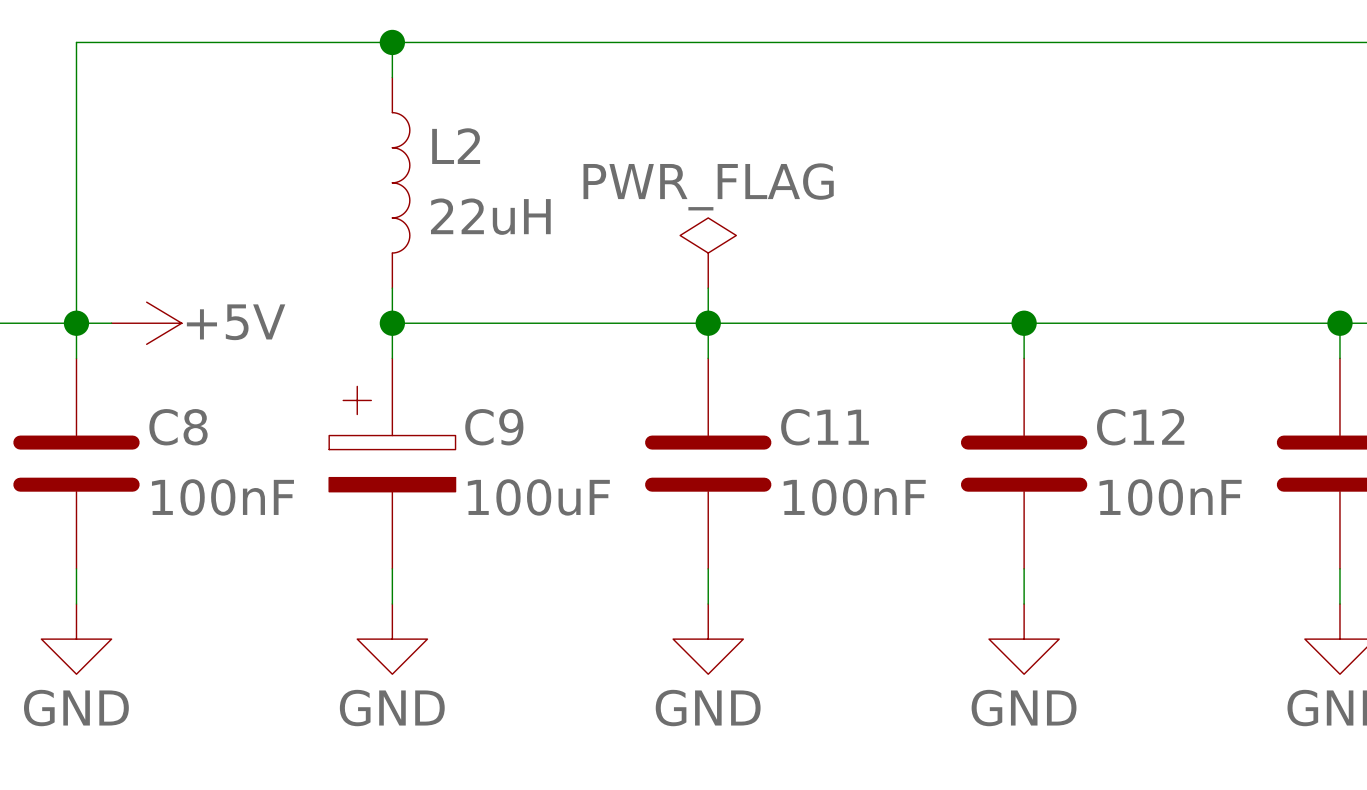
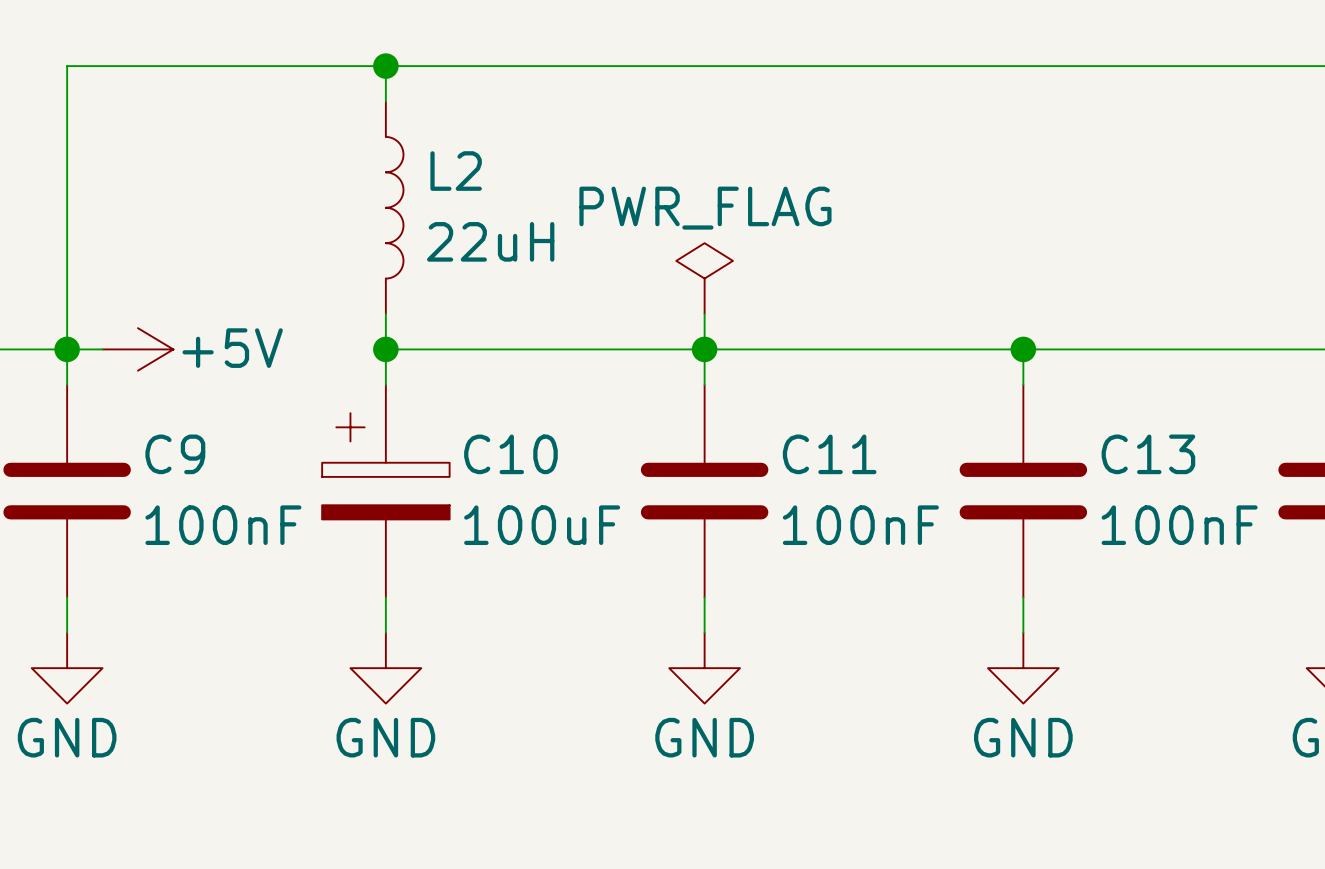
C8 name: C8 (178, 427) -> C9 (175, 454)
C9 name: C9 (494, 427) -> C10 (510, 454)
C12 name: C12 (1140, 427) -> C13 (1148, 454)

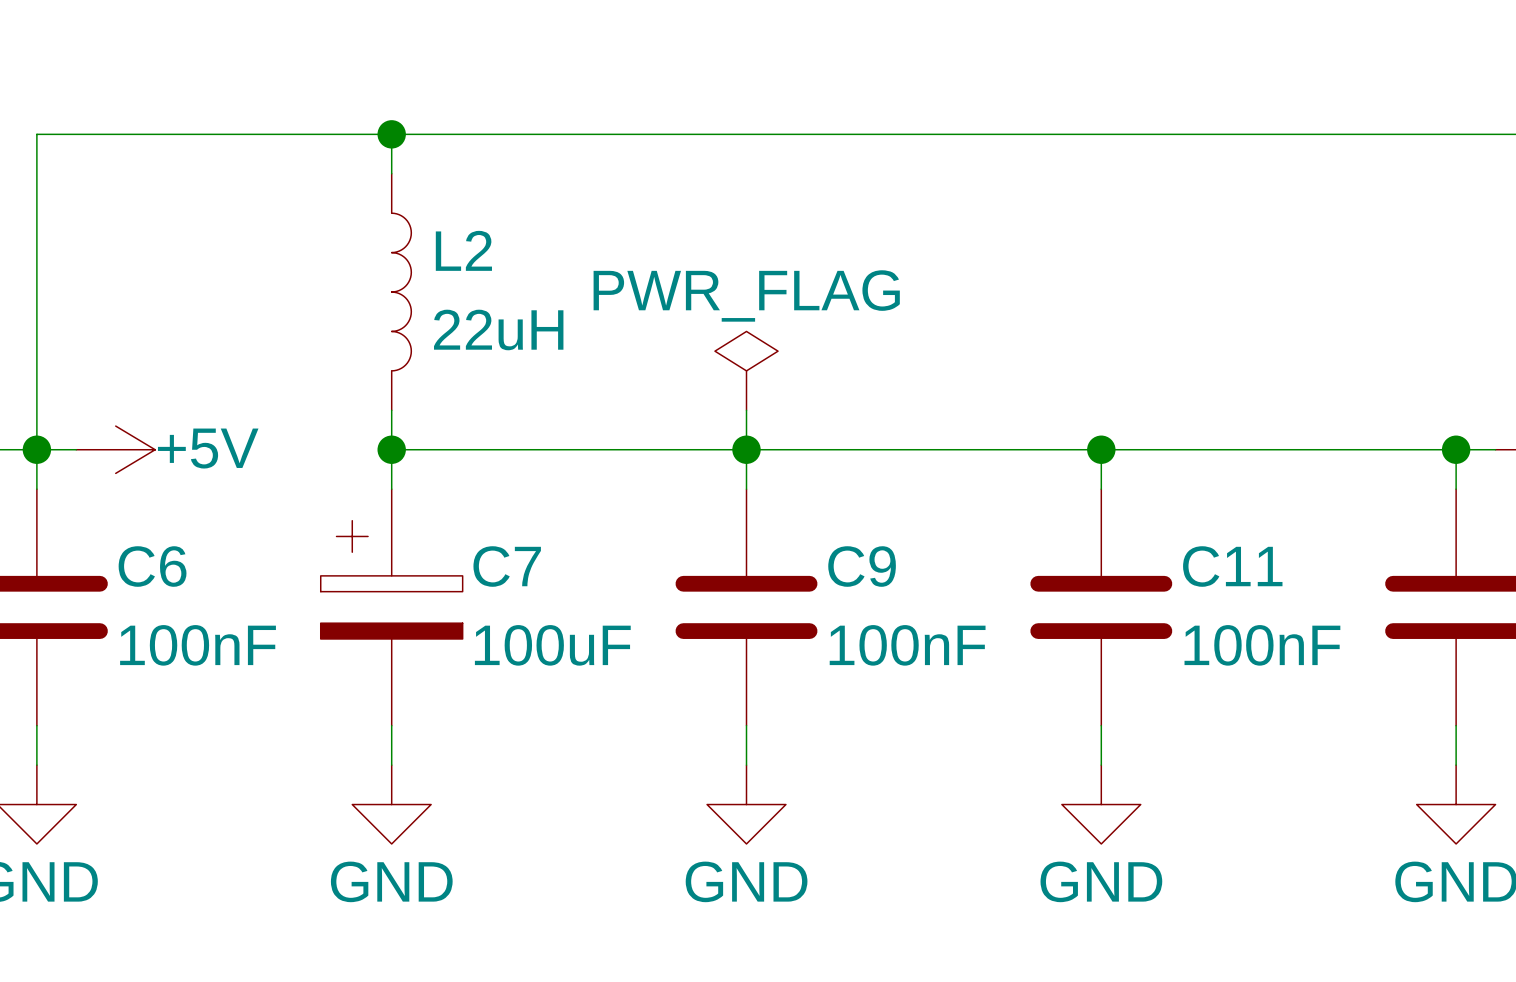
C9 name: C9 (175, 454) -> C6 (152, 566)
C10 name: C10 (510, 454) -> C7 (507, 566)
C11 name: C11 (829, 454) -> C9 (862, 566)
C13 name: C13 (1148, 454) -> C11 (1232, 566)

